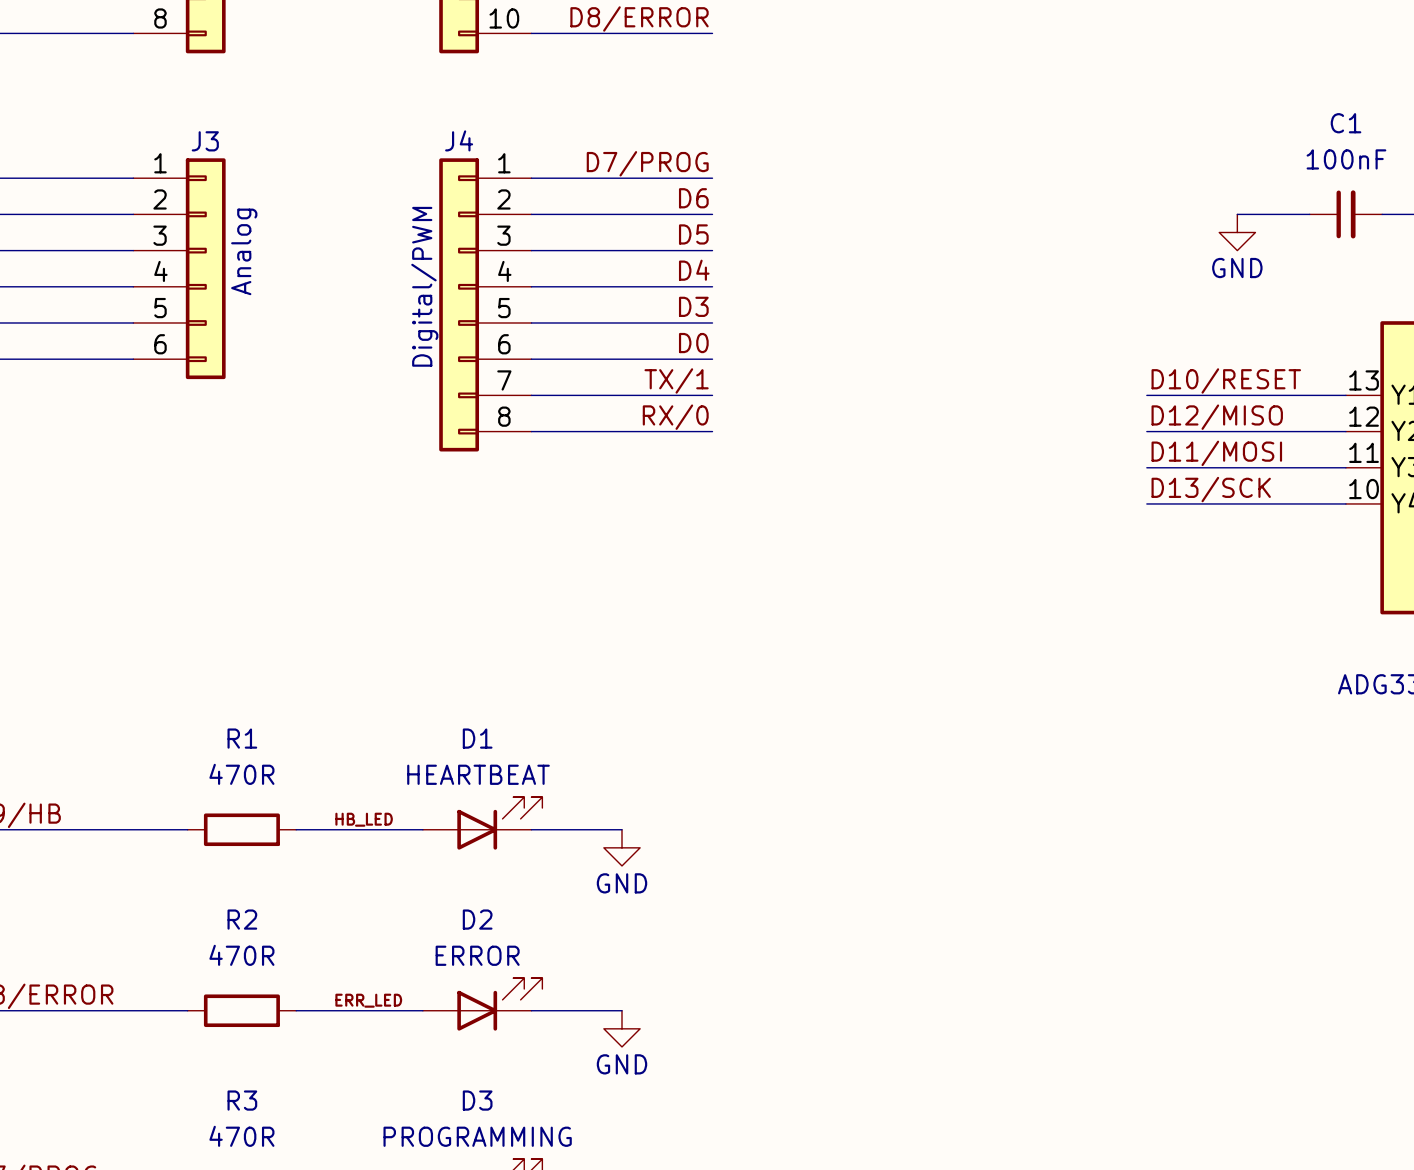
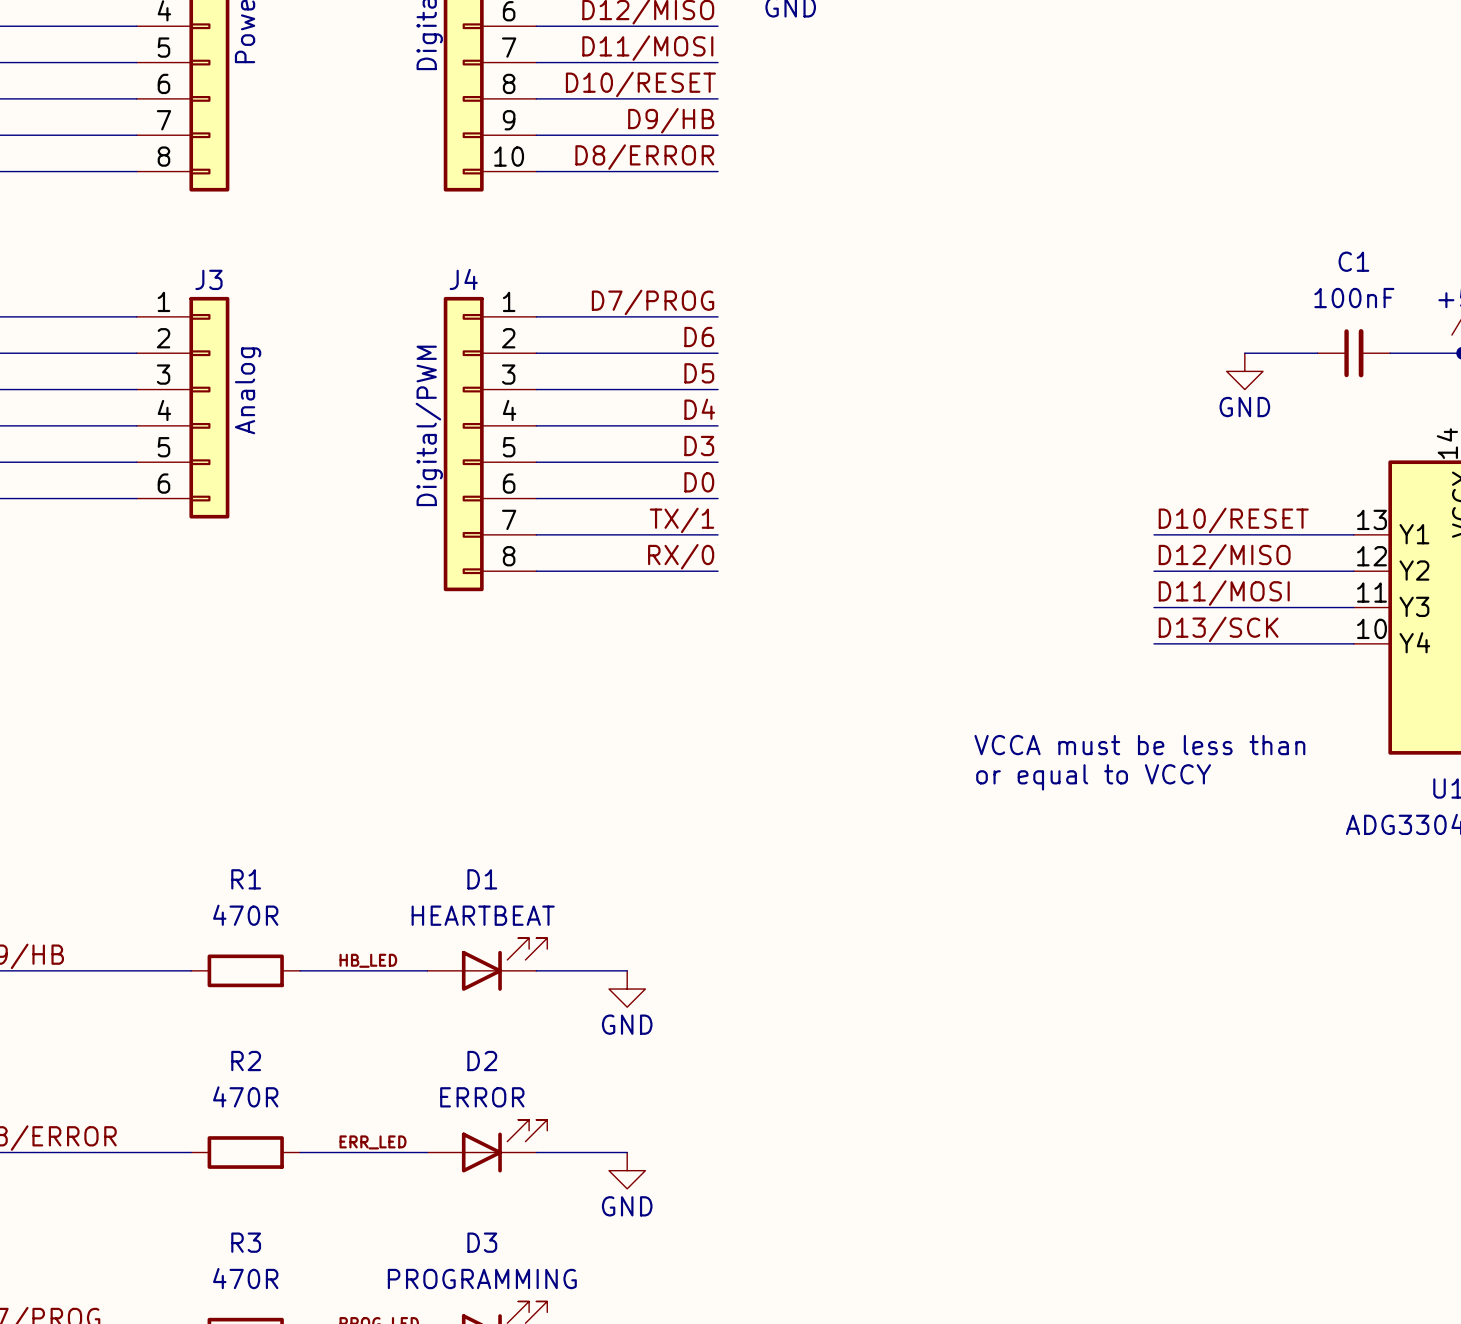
text: none -> VCCA must be less than (1139, 745)
text: none -> or equal to VCCY (1093, 777)

